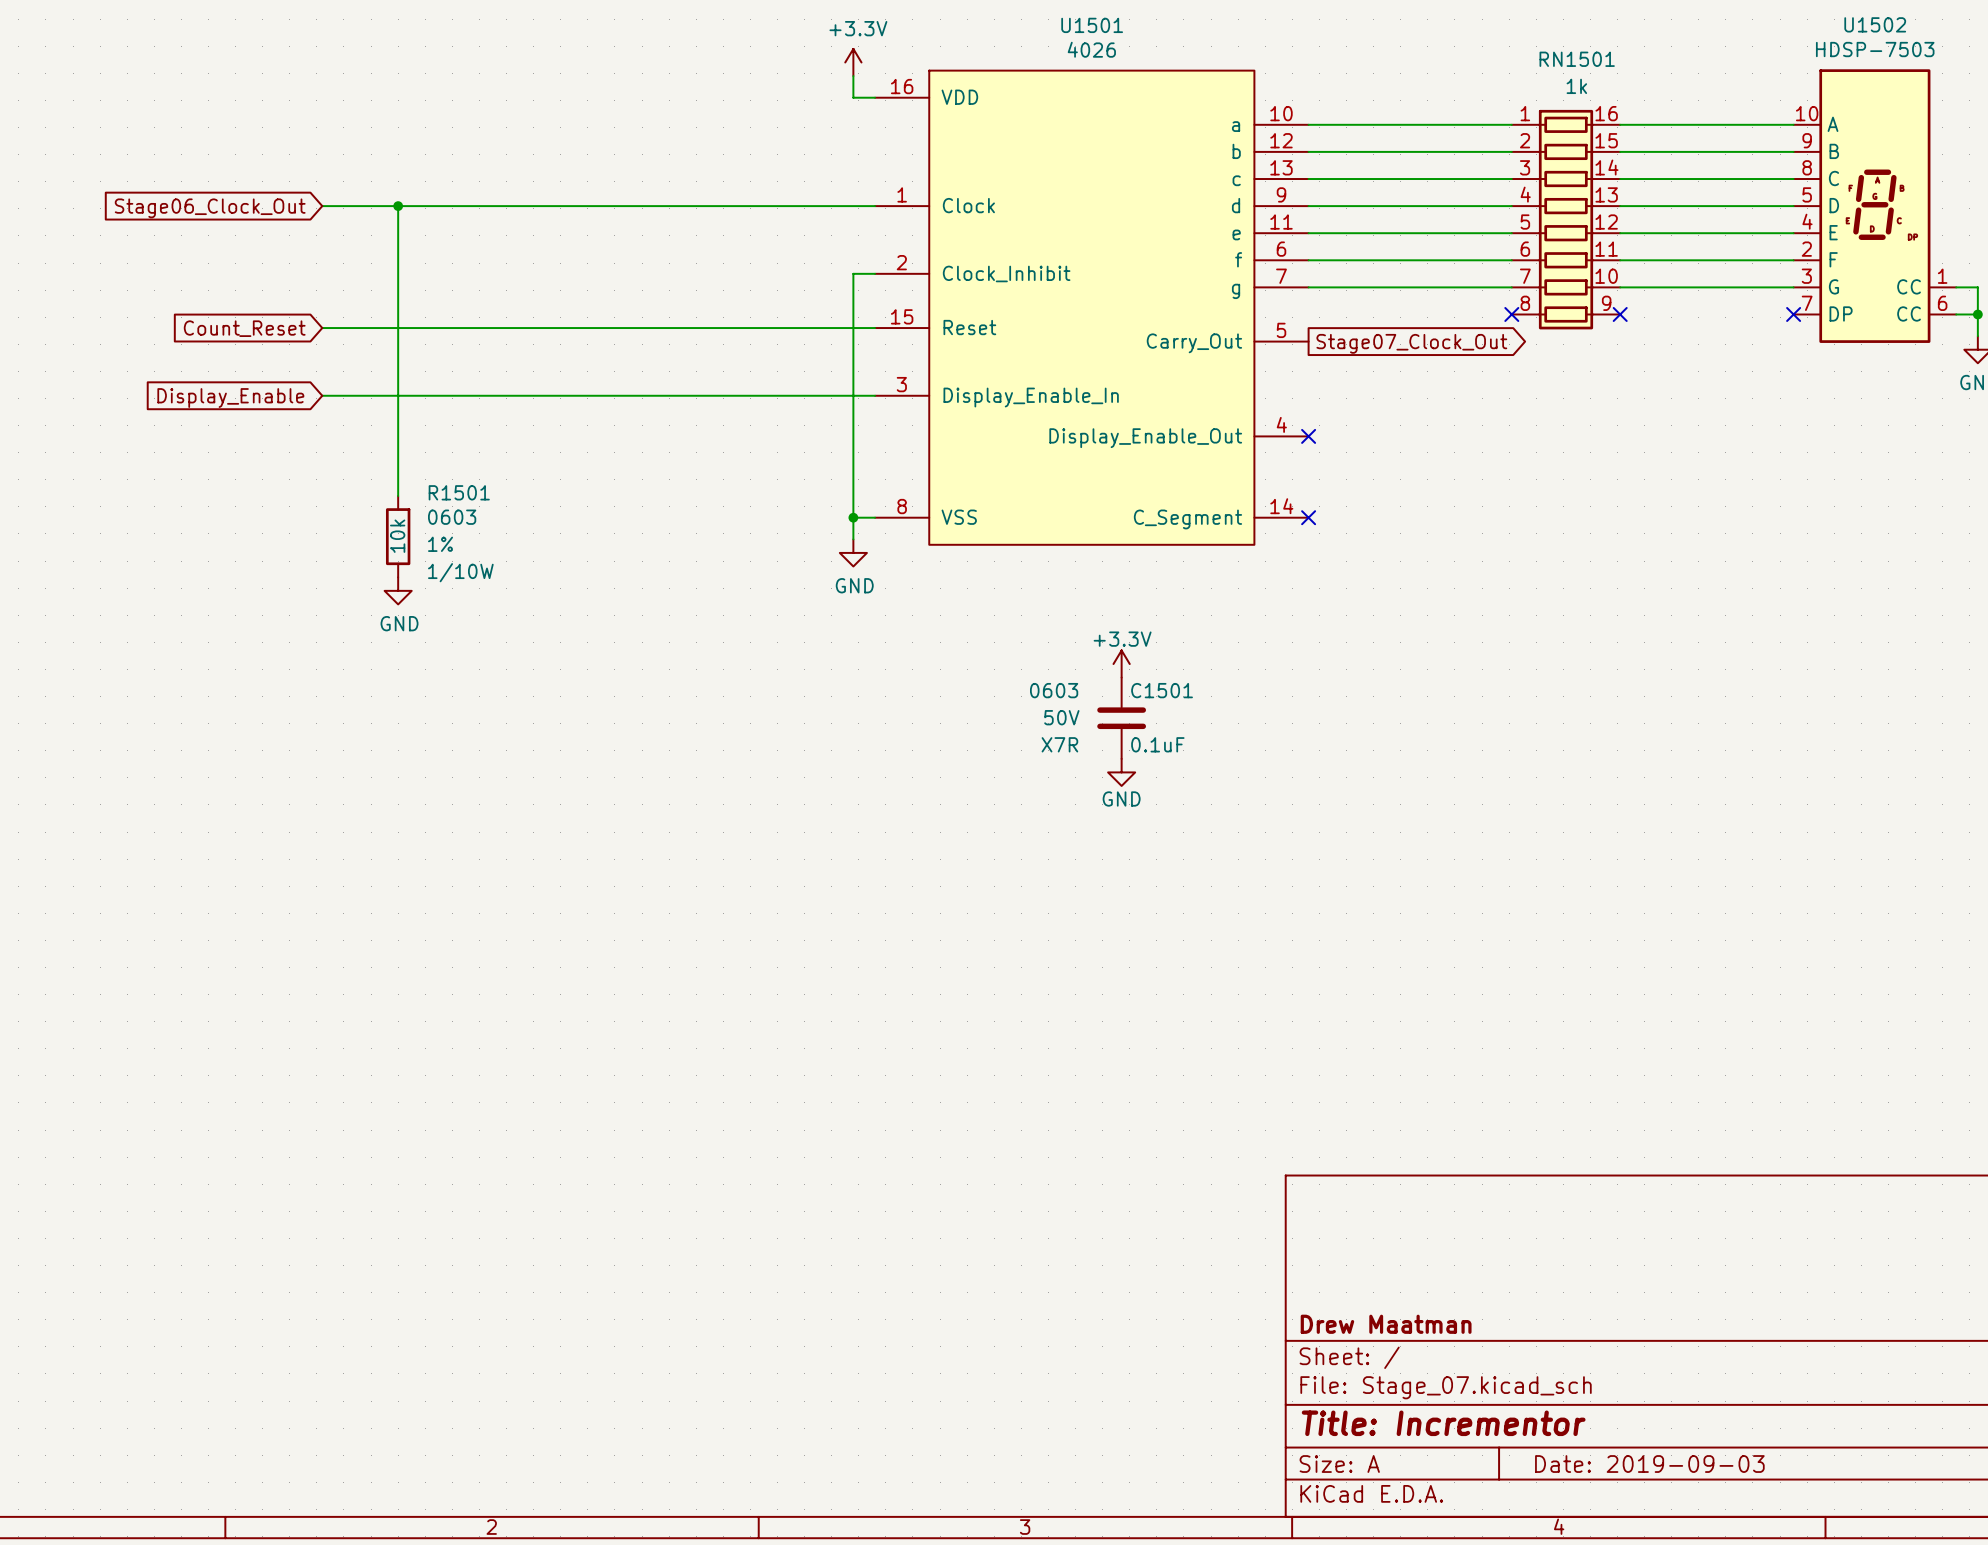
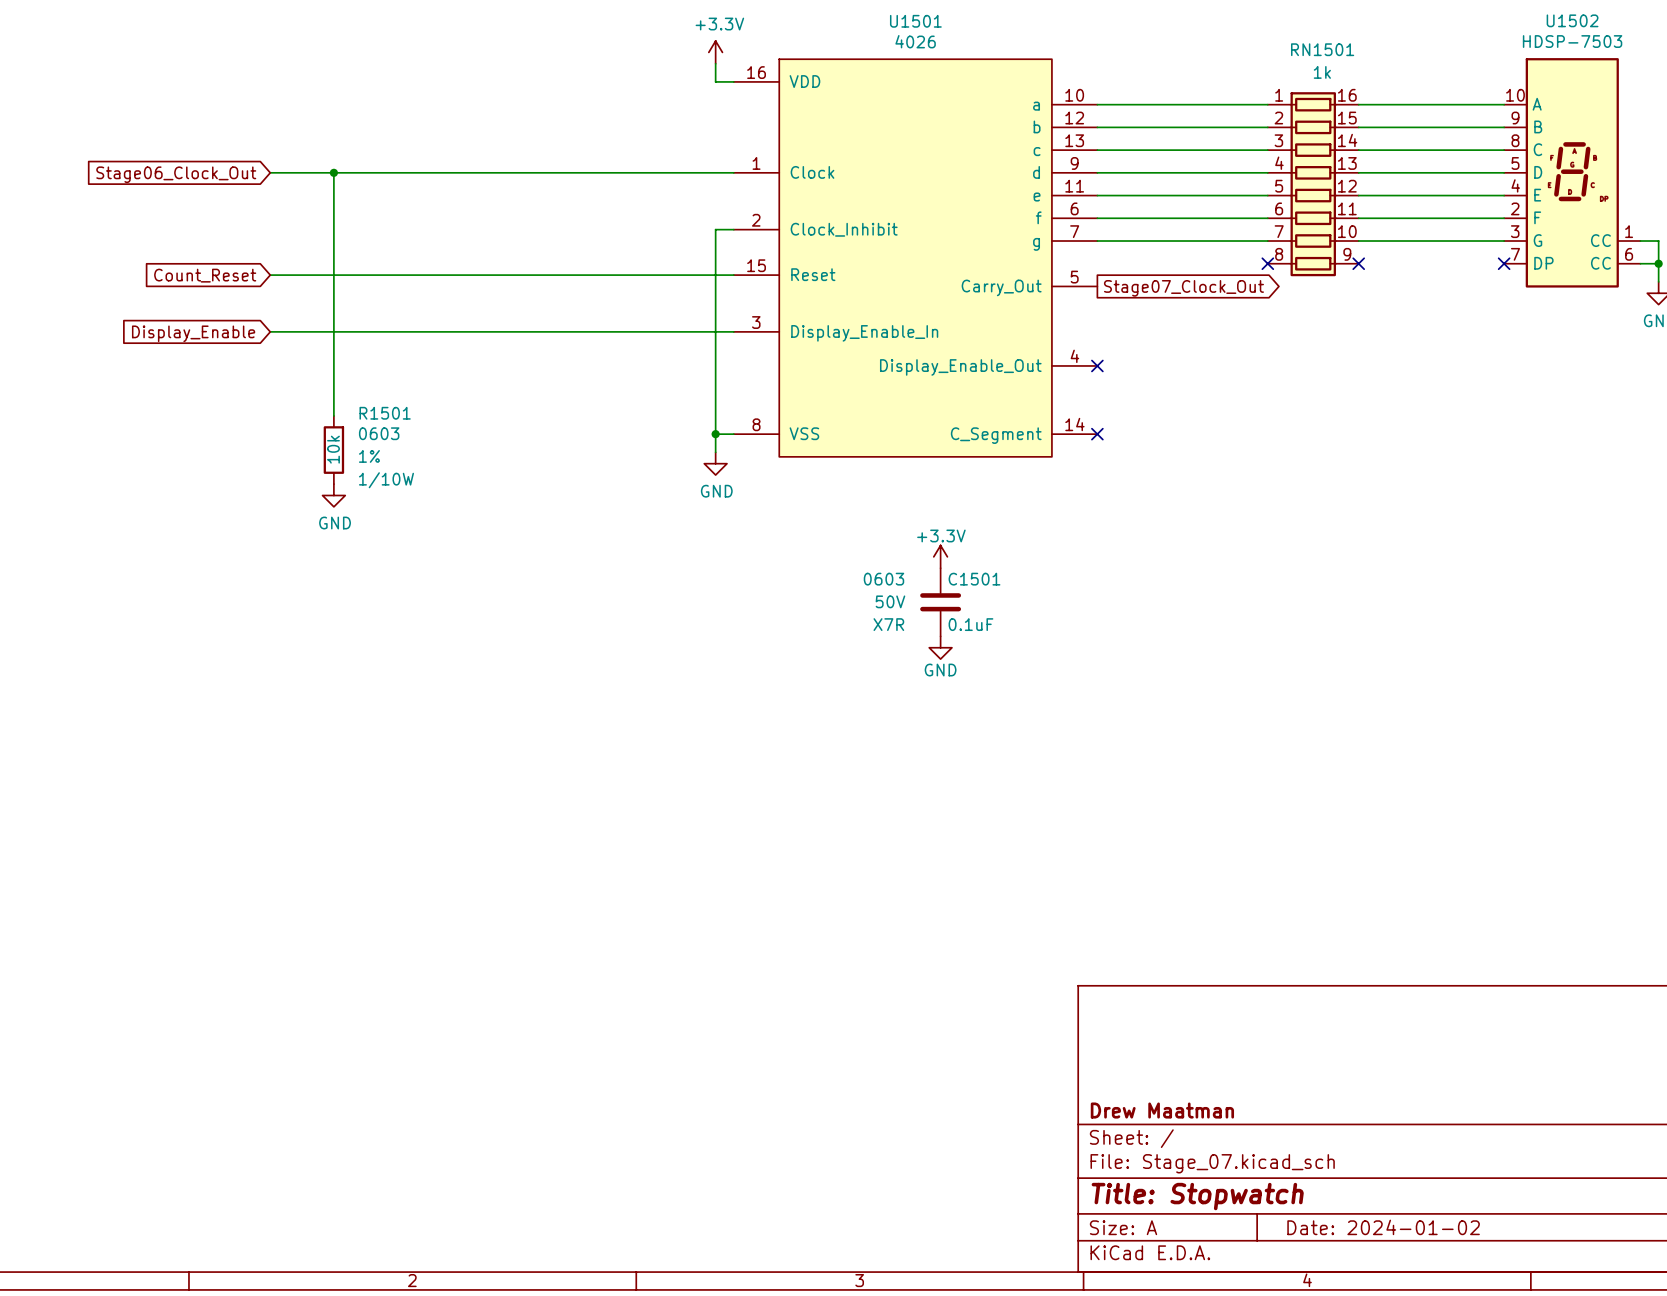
title block: Title: Incrementor (1443, 1423) -> Title: Stopwatch (1197, 1196)
title block: Date: 2019-09-03 (1649, 1464) -> Date: 2024-01-02 (1383, 1227)

